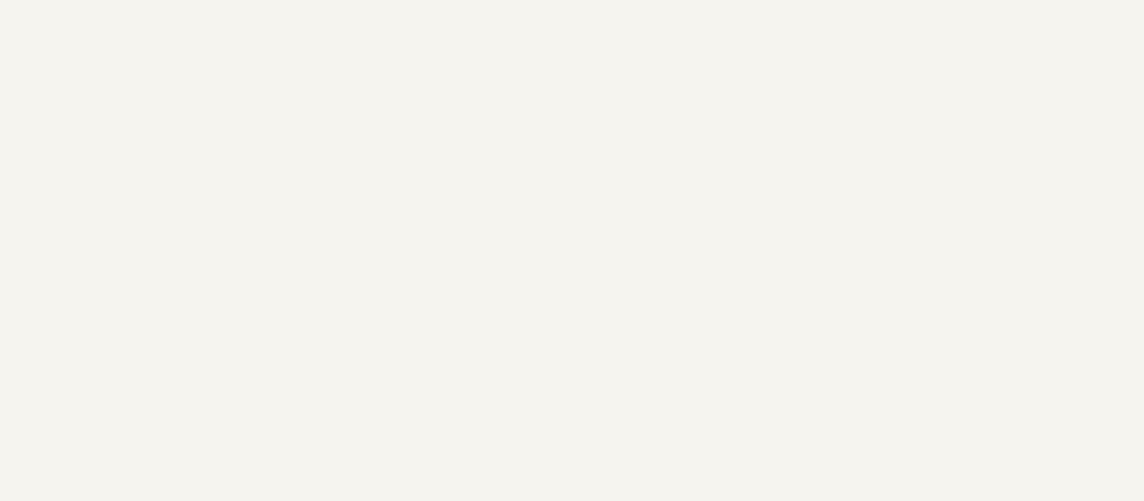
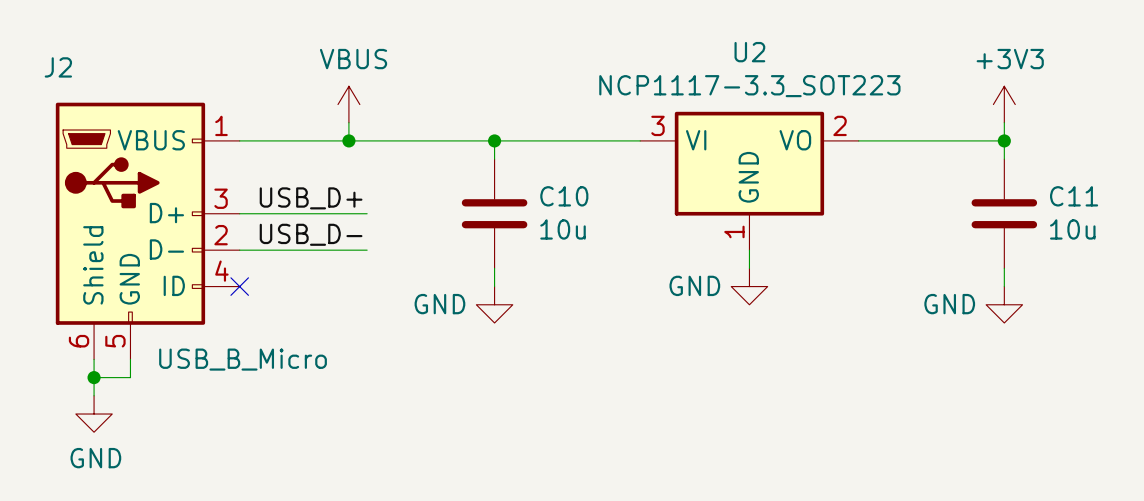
power symbol: none -> VBUS (348, 104)
power symbol: none -> +3V3 (1004, 104)
wire: none -> (348, 122) (348, 140)
wire: none -> (1004, 122) (1004, 159)
wire: none -> (239, 140) (640, 140)
junction: none -> (348, 140)
wire: none -> (494, 140) (494, 159)
junction: none -> (494, 140)
wire: none -> (858, 140) (1004, 140)
junction: none -> (1004, 140)
U2: none -> NCP1117-3.3_SOT223 (749, 180)
label: none -> USB_D+ (311, 198)
wire: none -> (239, 213) (367, 213)
C10: none -> 10u (494, 213)
C11: none -> 10u (1004, 213)
J2: none -> USB_B_Micro (147, 231)
label: none -> USB_D- (311, 234)
wire: none -> (239, 250) (367, 250)
wire: none -> (749, 250) (749, 268)
wire: none -> (494, 268) (494, 286)
wire: none -> (1004, 268) (1004, 286)
no-connect mark: none -> (239, 286)
power symbol: none -> GND (749, 286)
power symbol: none -> GND (494, 304)
power symbol: none -> GND (1004, 304)
wire: none -> (94, 359) (94, 395)
wire: none -> (130, 359) (130, 377) (94, 377)
junction: none -> (94, 377)
power symbol: none -> GND (94, 414)

